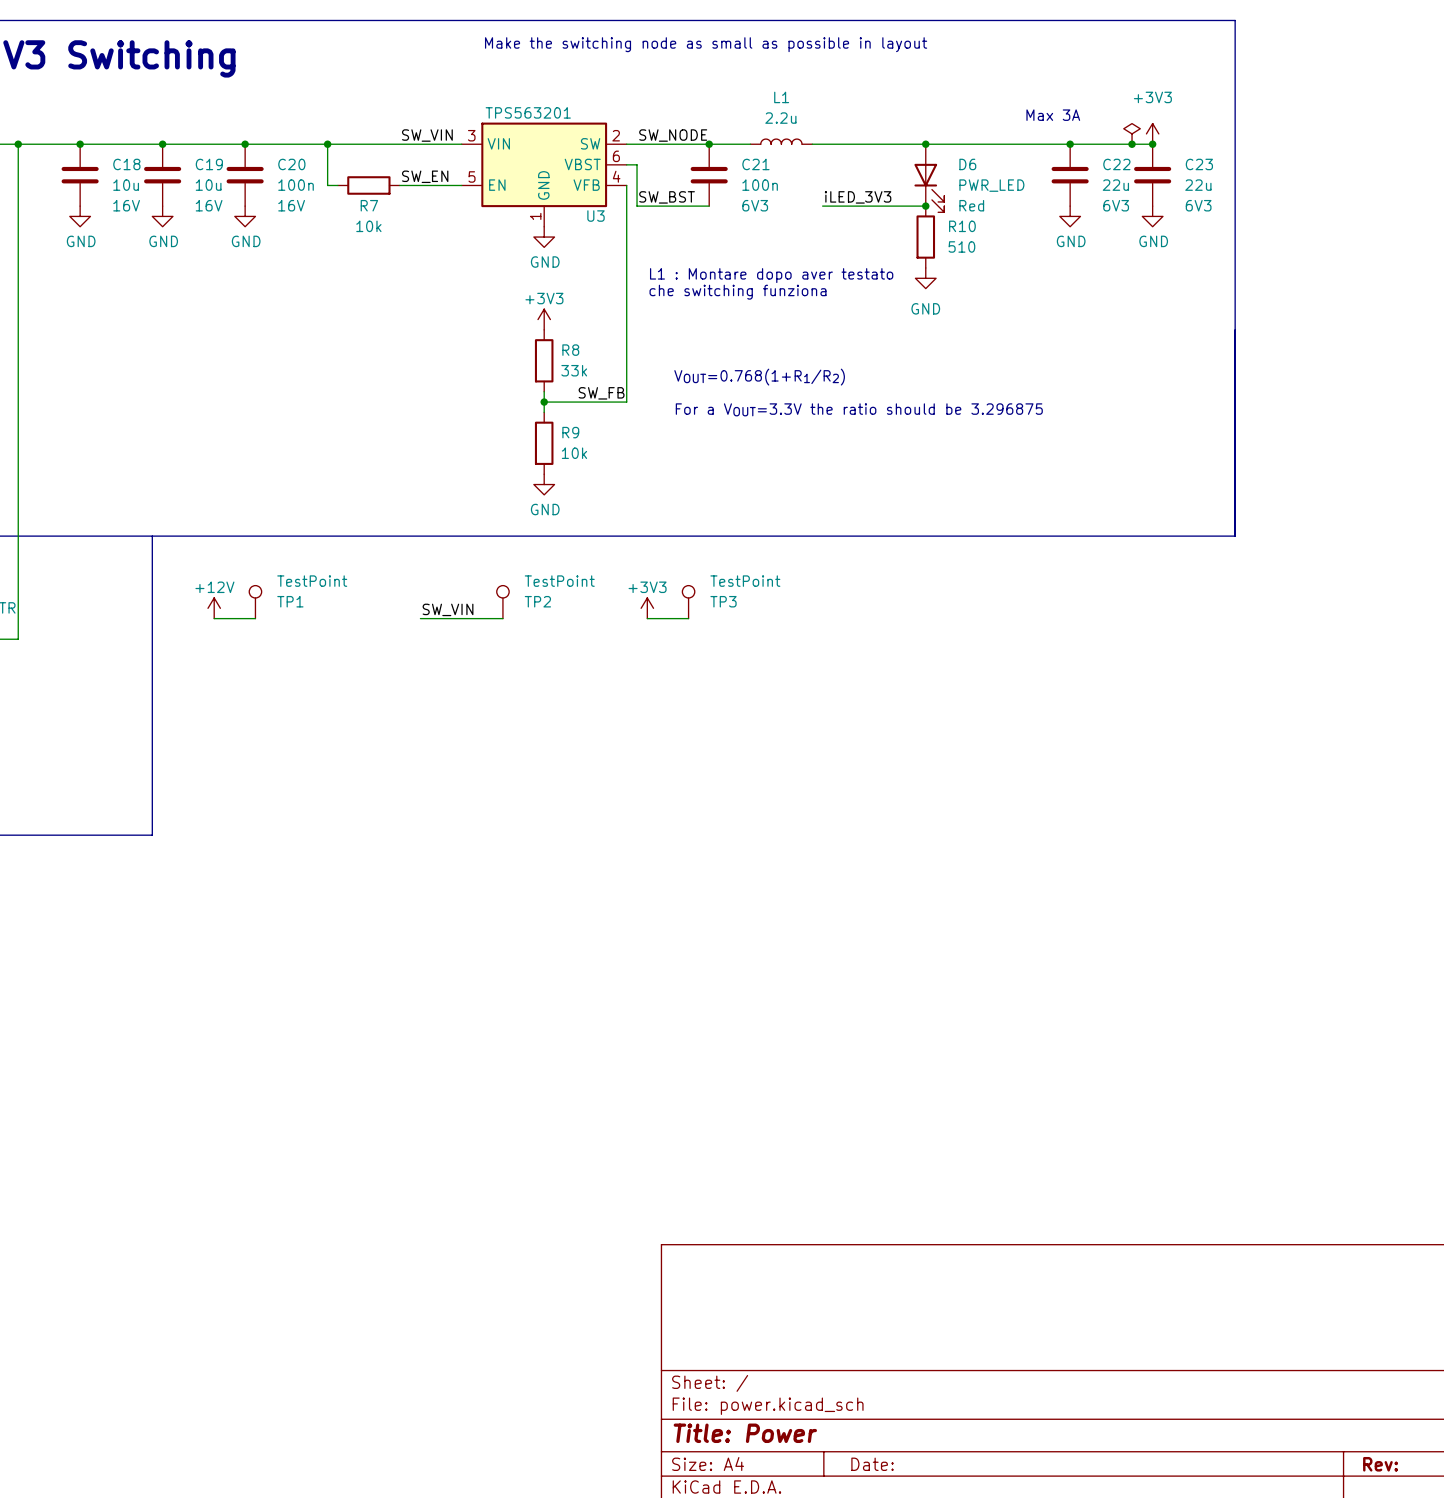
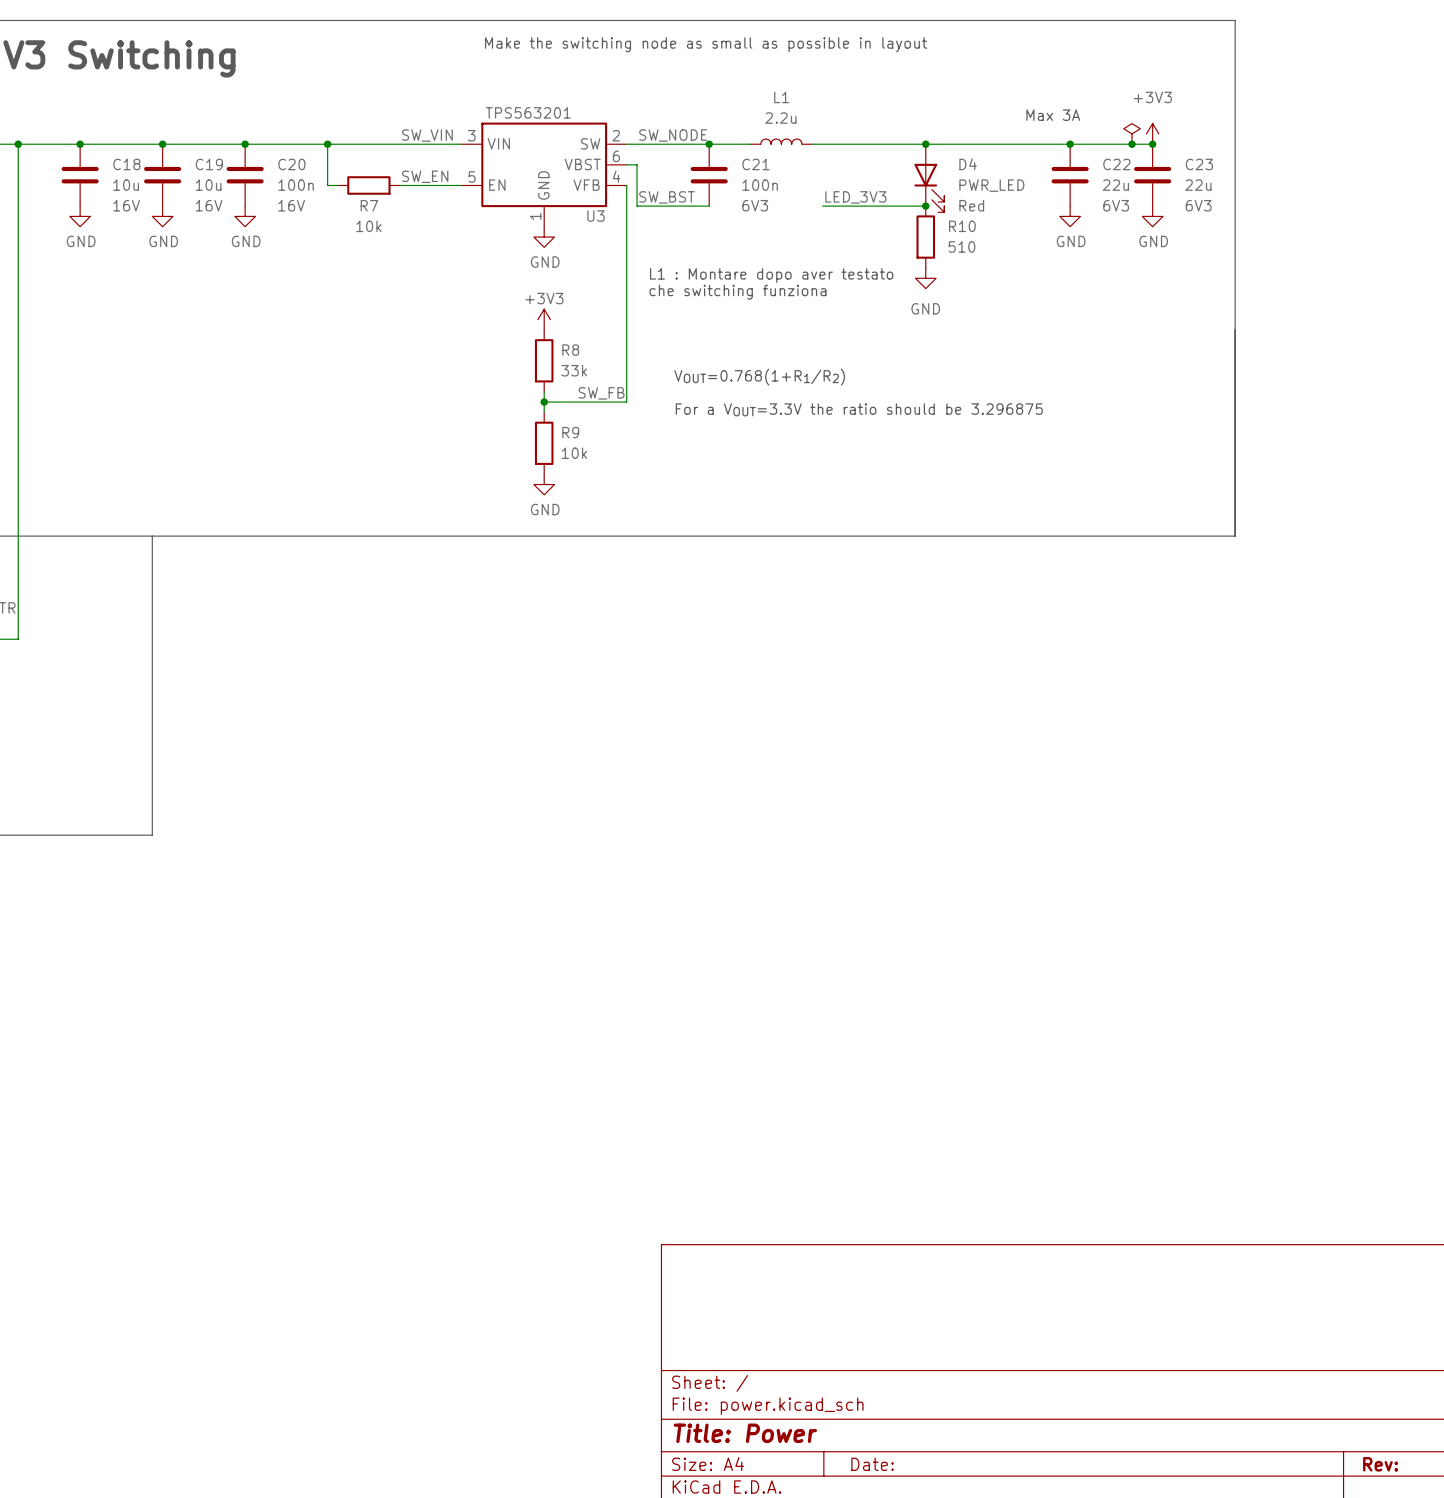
D6 name: D6 (967, 164) -> D4 (968, 164)
label: iLED_3V3 (858, 197) -> LED_3V3 (855, 197)
TP1: TestPoint (255, 602) -> none
TP2: TestPoint (502, 602) -> none
TP3: TestPoint (688, 602) -> none
power symbol: +12V (214, 608) -> none
power symbol: +3V3 (647, 608) -> none
label: SW_VIN (448, 609) -> none
wire: (214, 618) (255, 618) -> none
wire: (420, 618) (502, 618) -> none
wire: (647, 618) (688, 618) -> none

